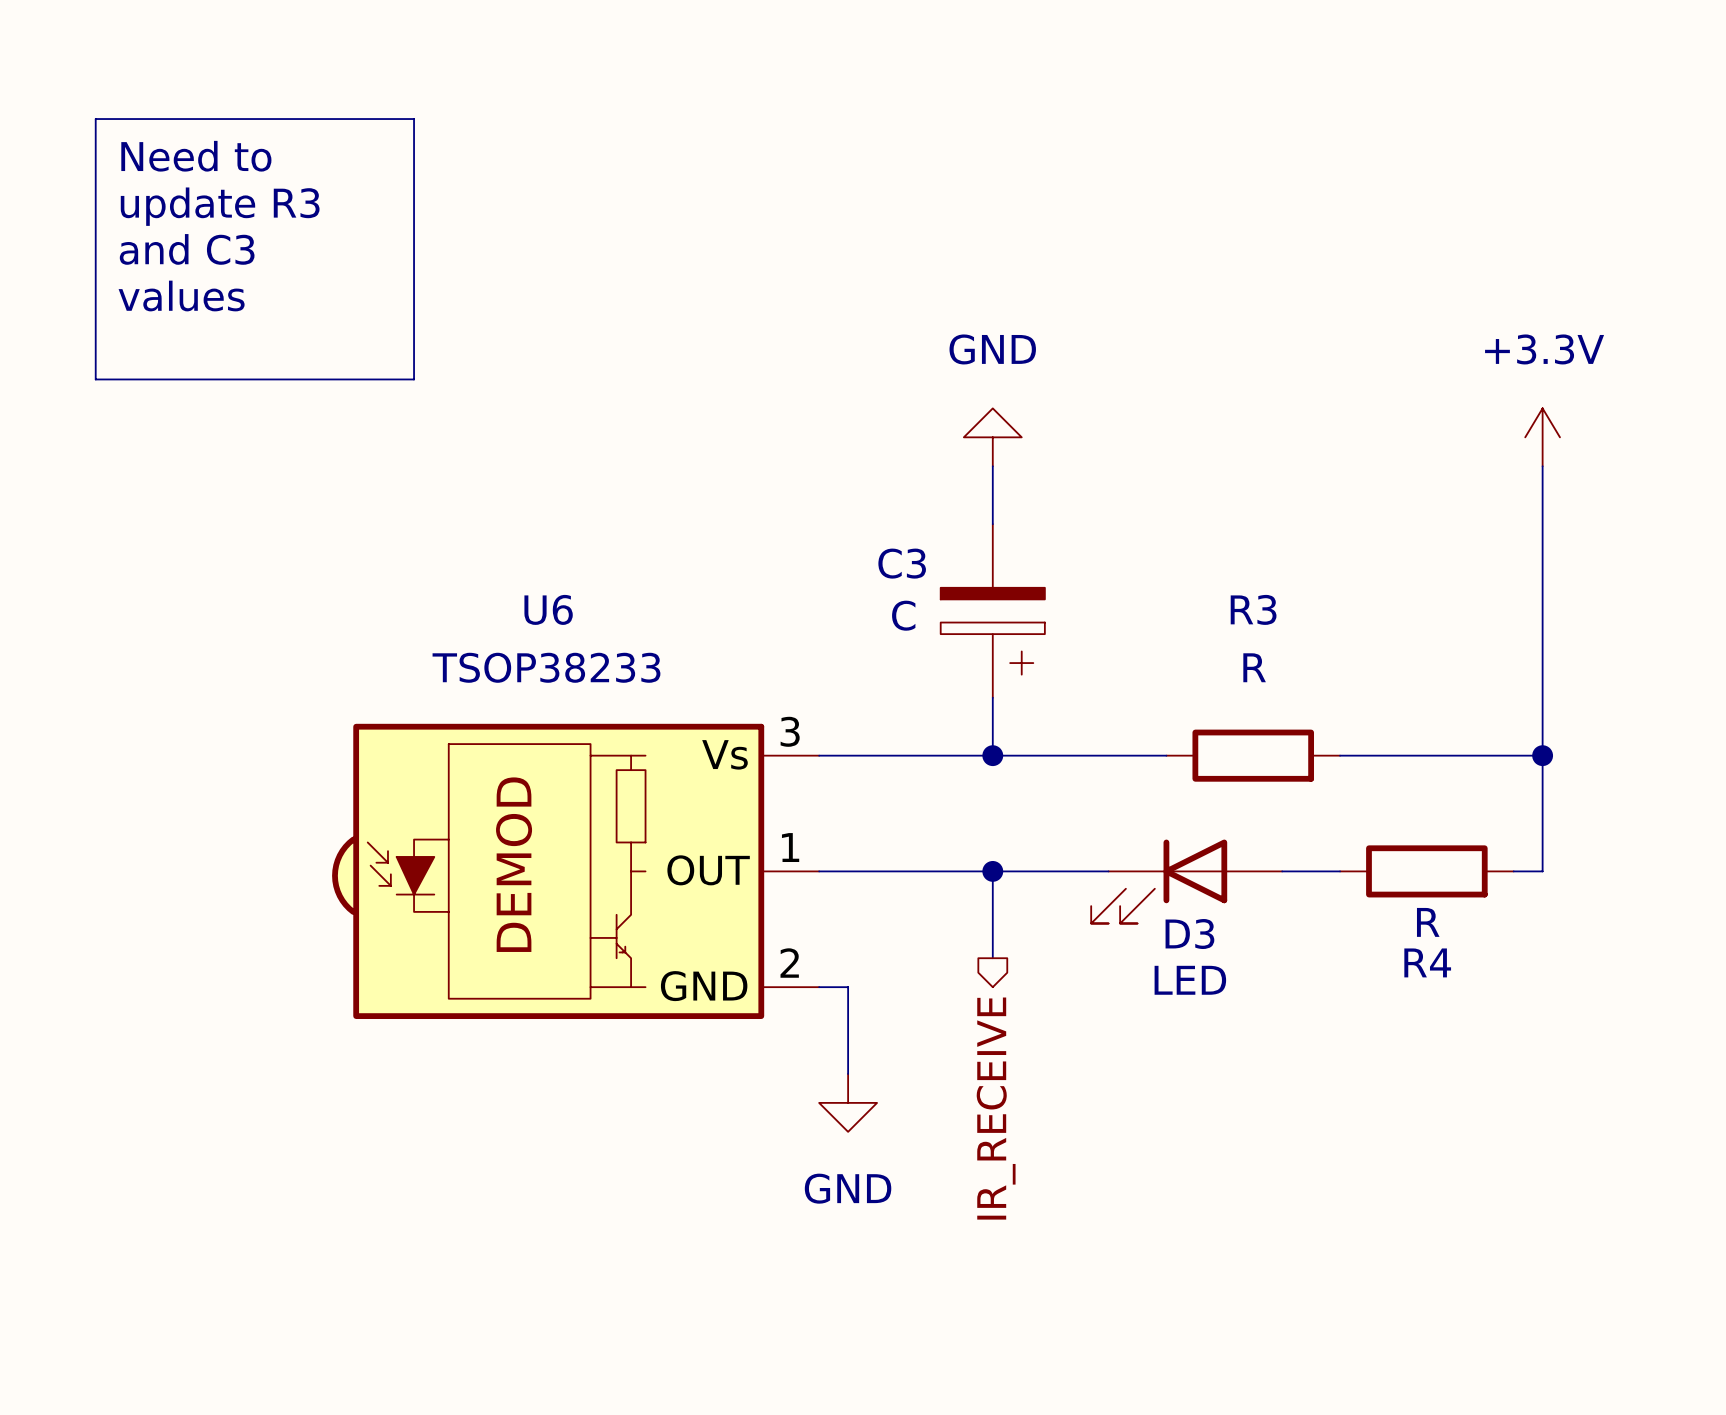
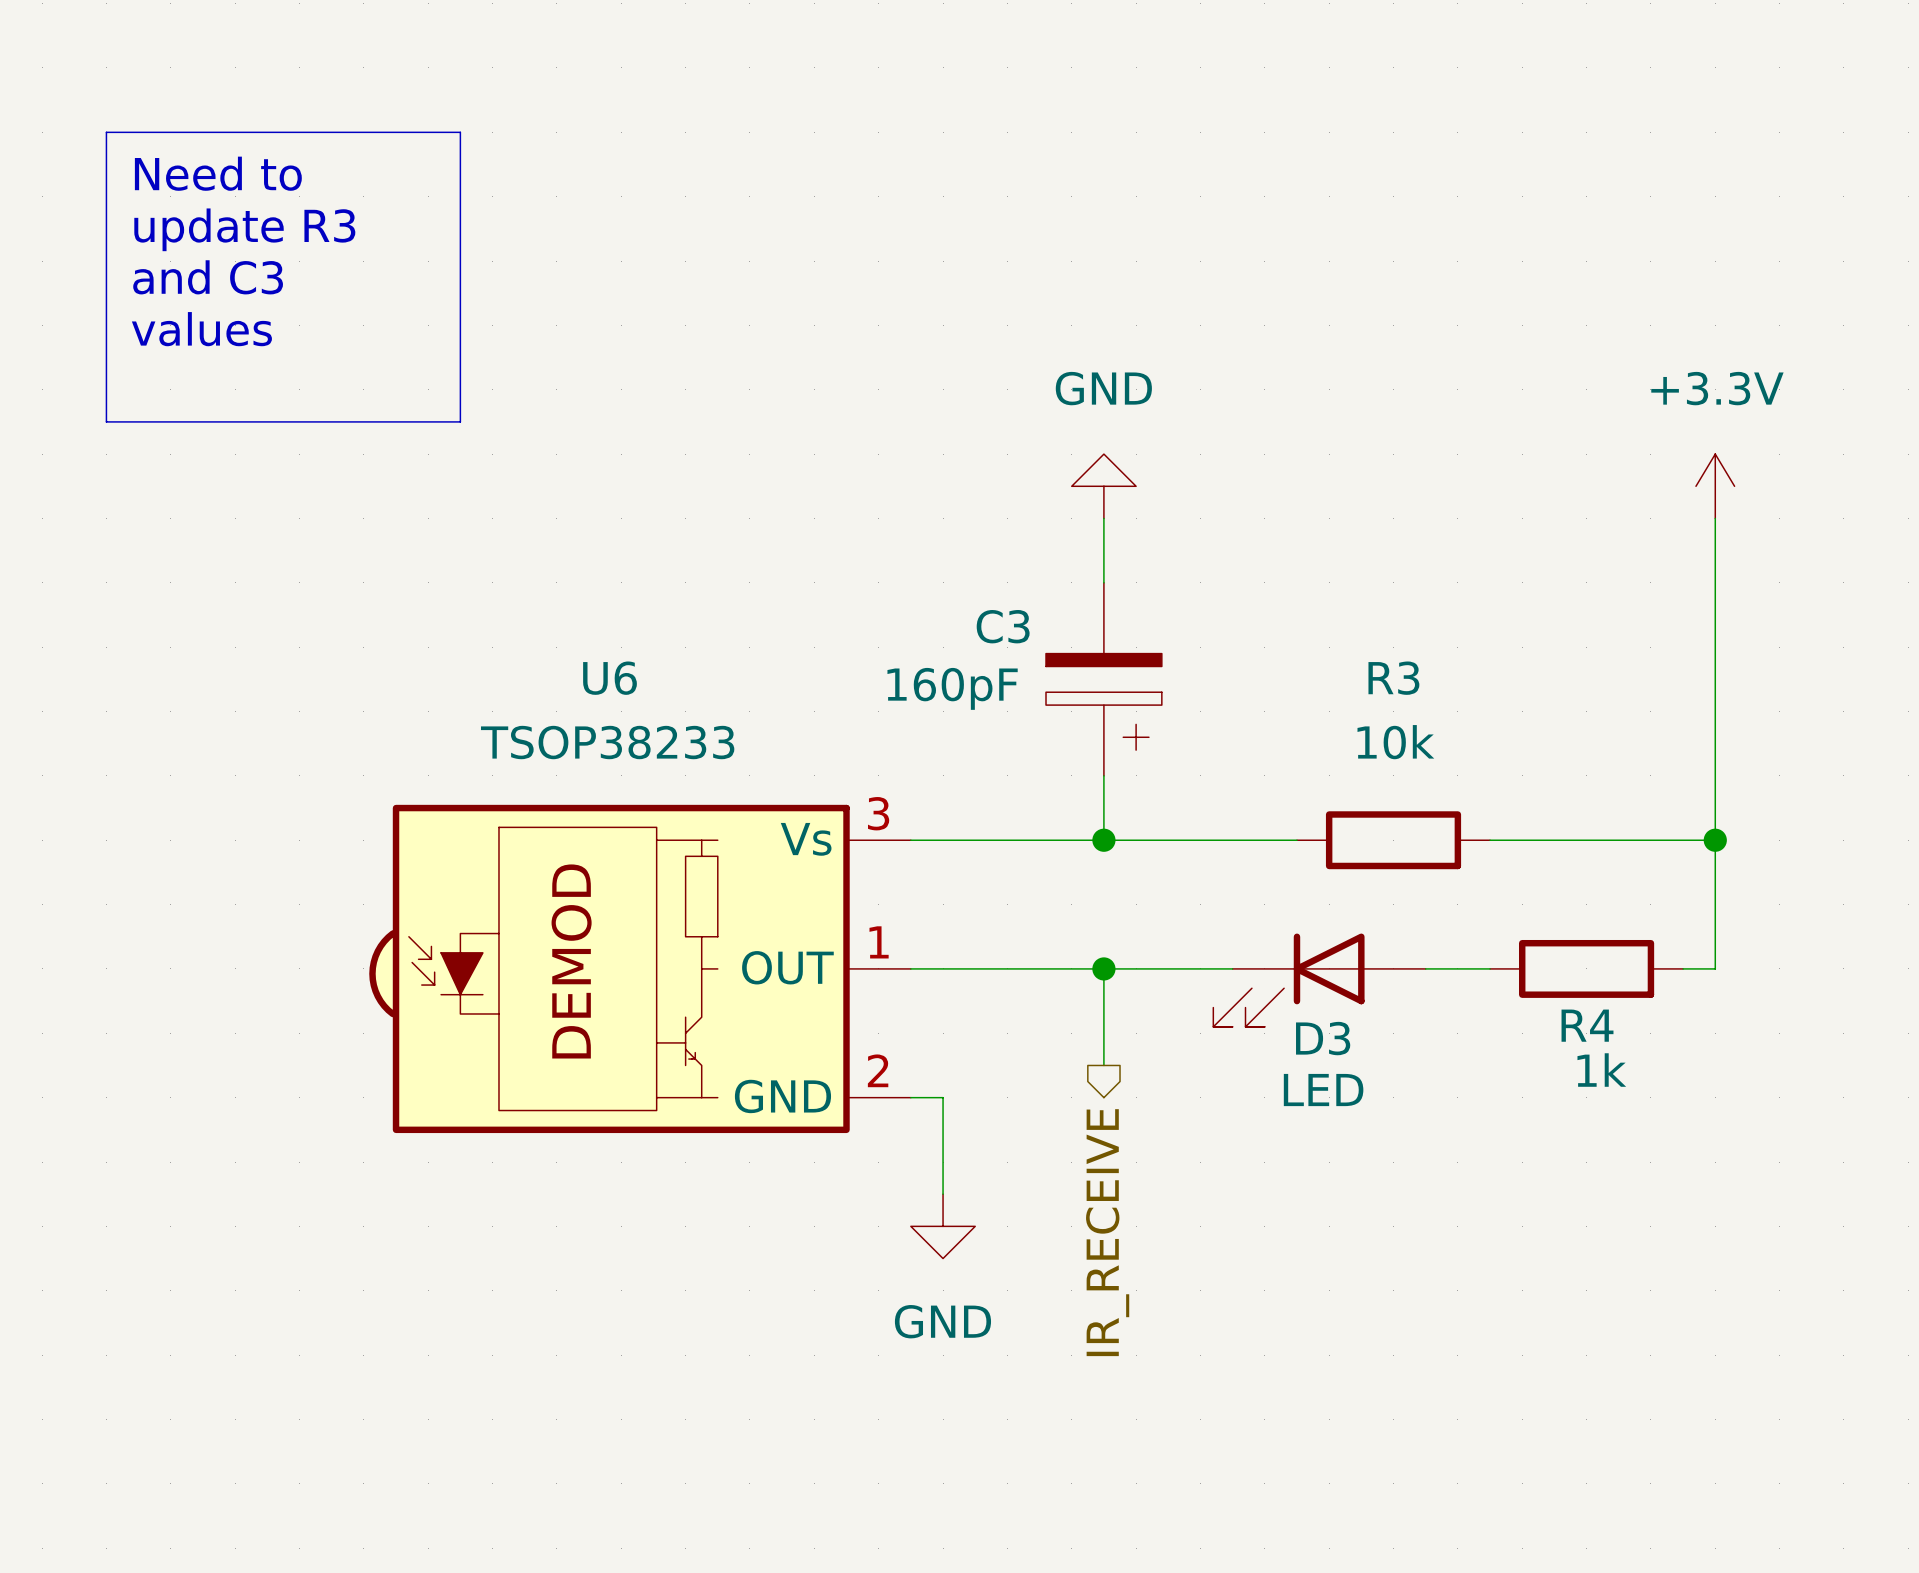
C3 value: C (903, 615) -> 160pF (952, 688)
R3 value: R (1254, 667) -> 10k (1395, 742)
R4 value: R (1428, 922) -> 1k (1601, 1070)
R4 name position: R4 (1427, 962) -> R4 (1587, 1025)

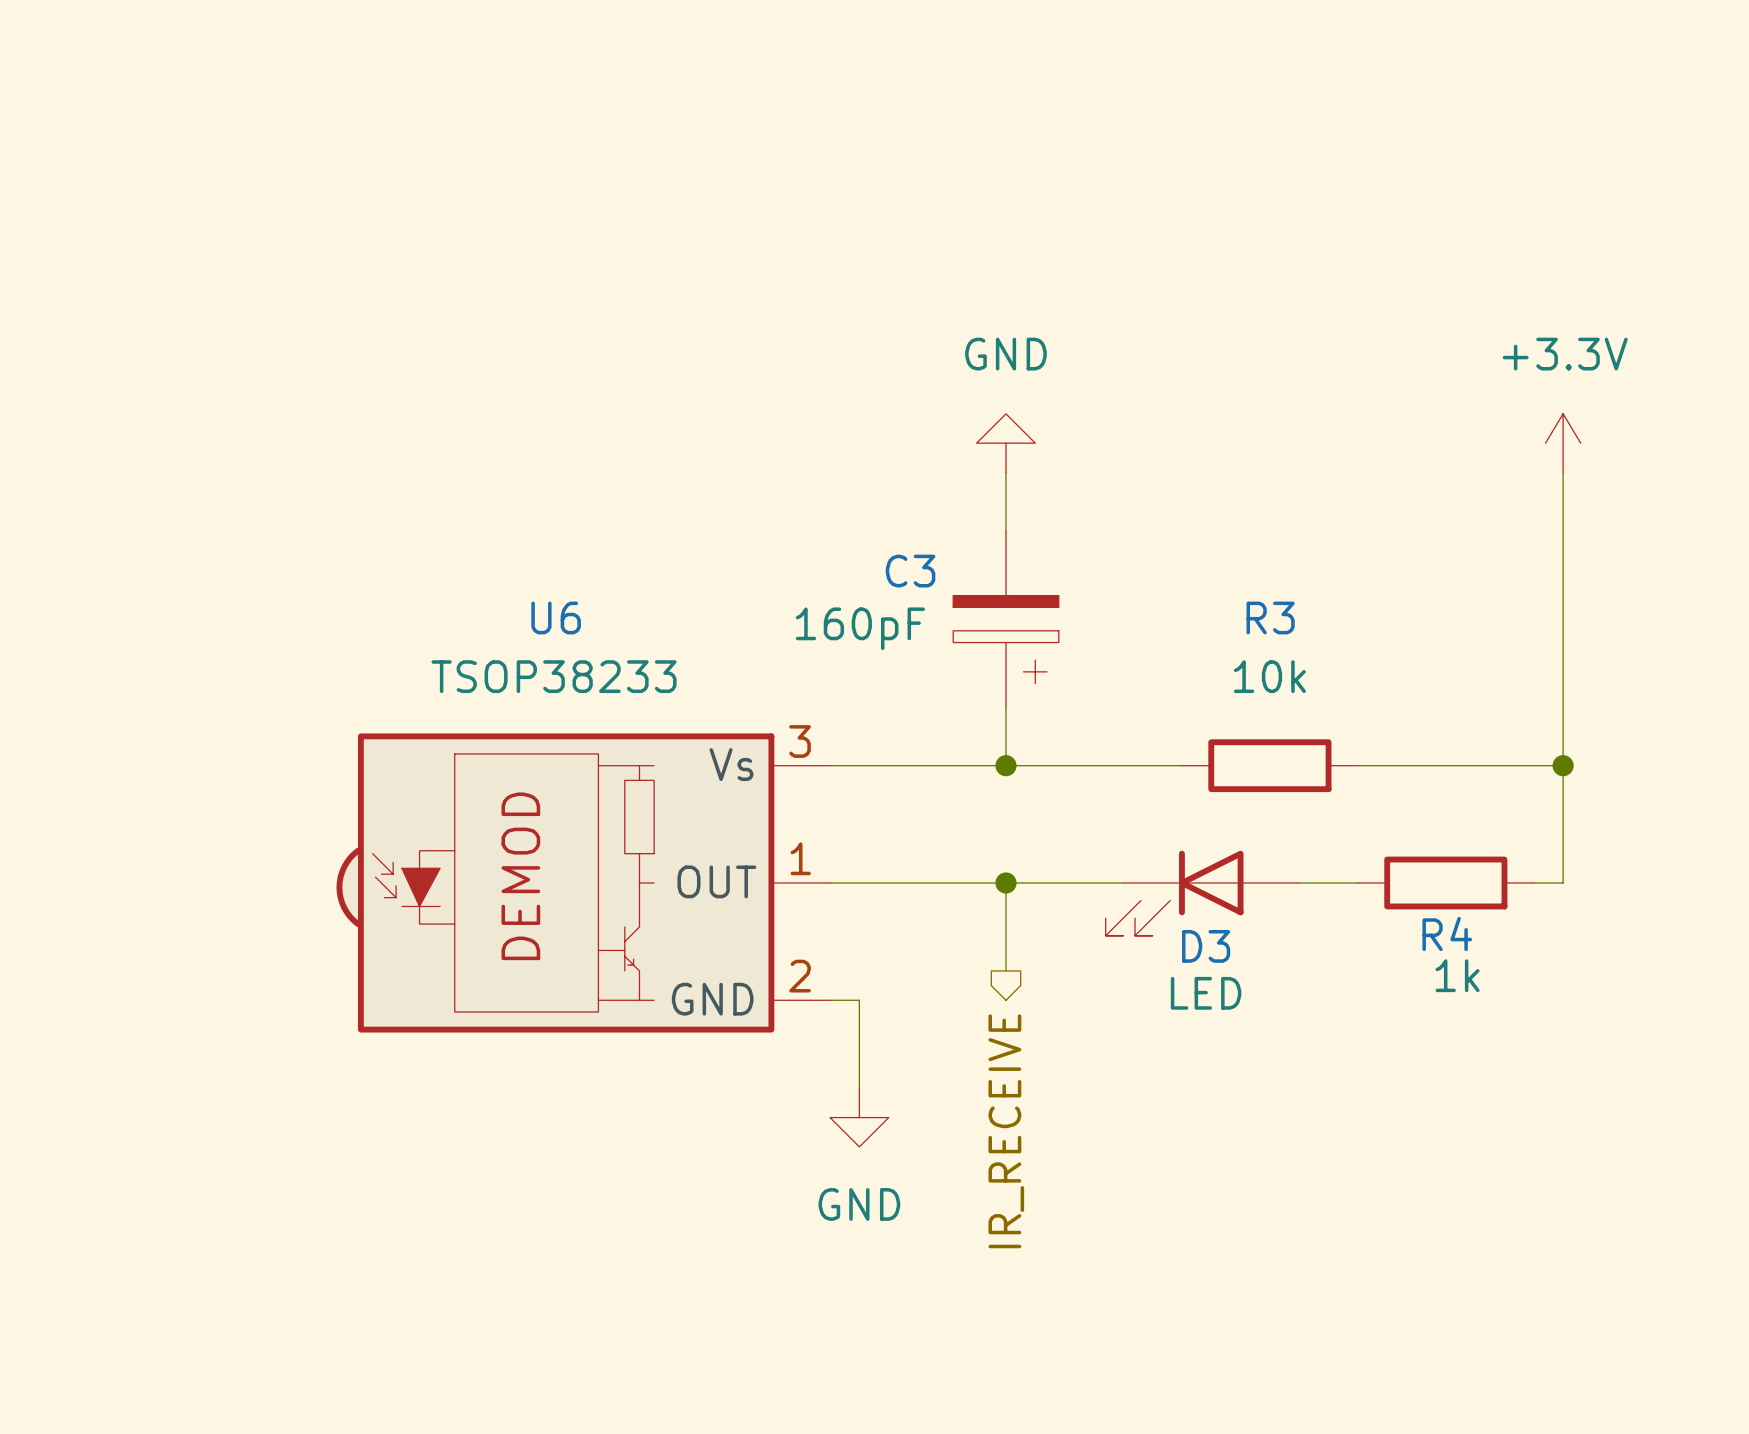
line: (106, 132) (460, 132) (460, 421) (106, 421) (106, 132) -> none
text: Need to (218, 173) -> none
text: update R3 (244, 229) -> none
text: and C3 (208, 277) -> none
text: values (201, 329) -> none

